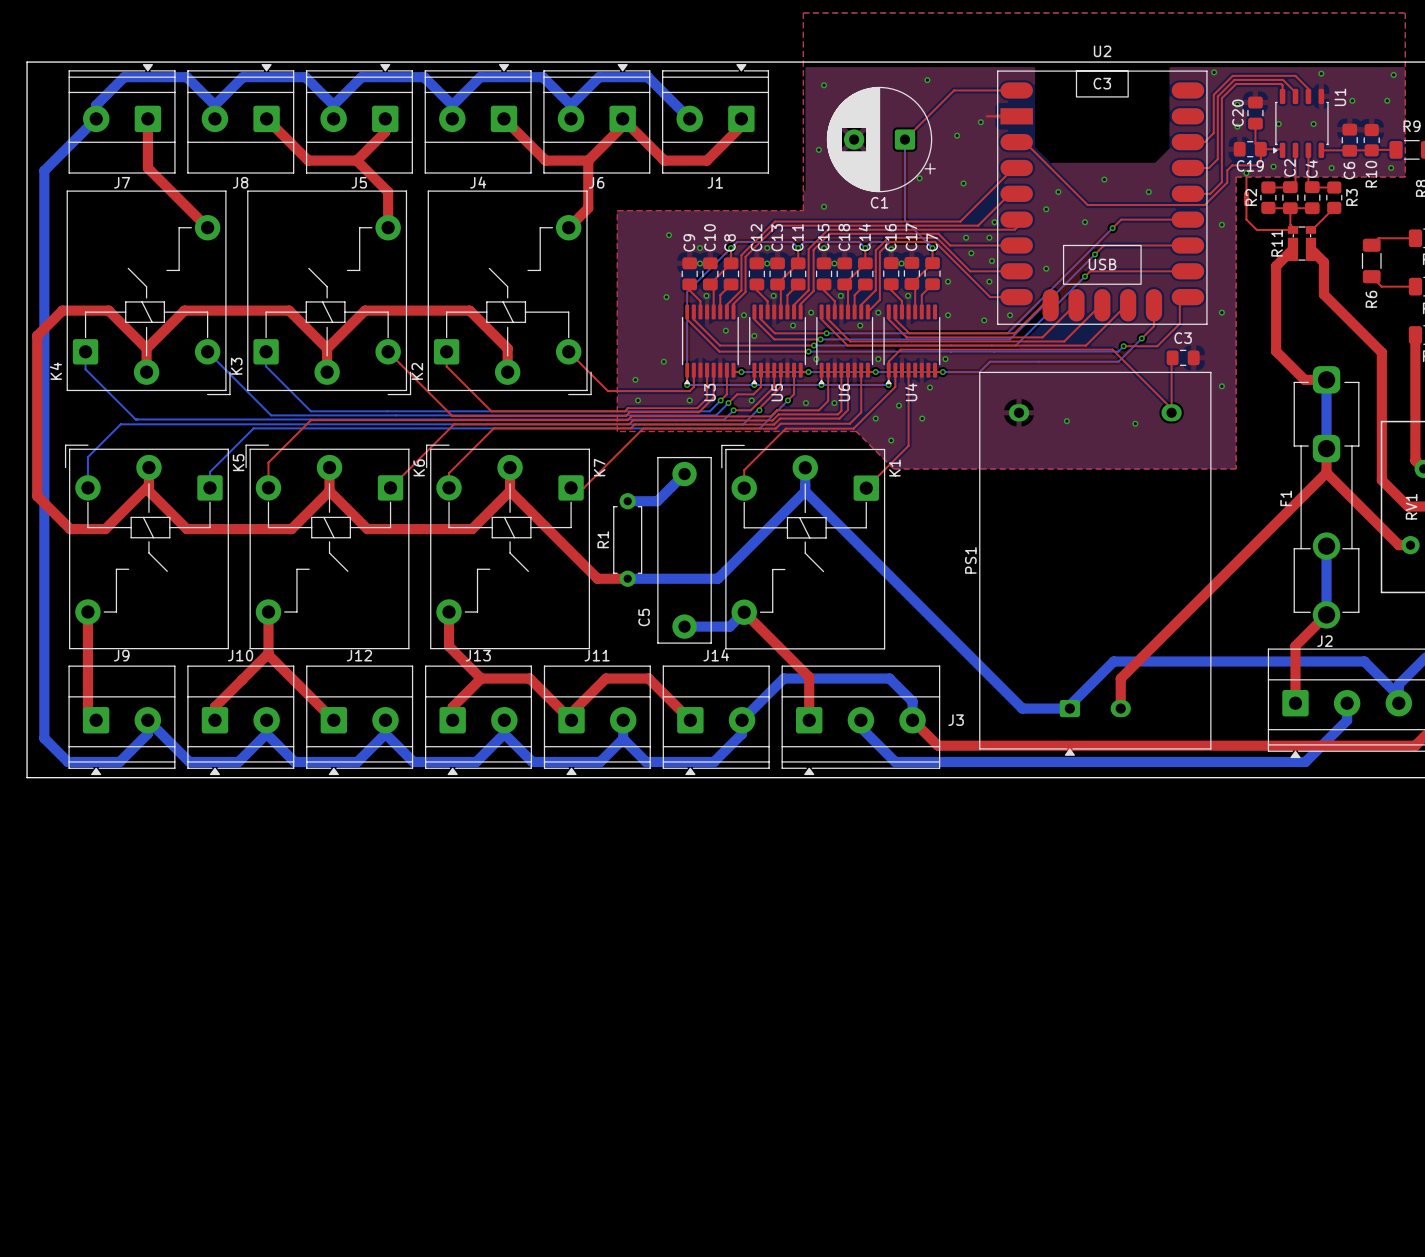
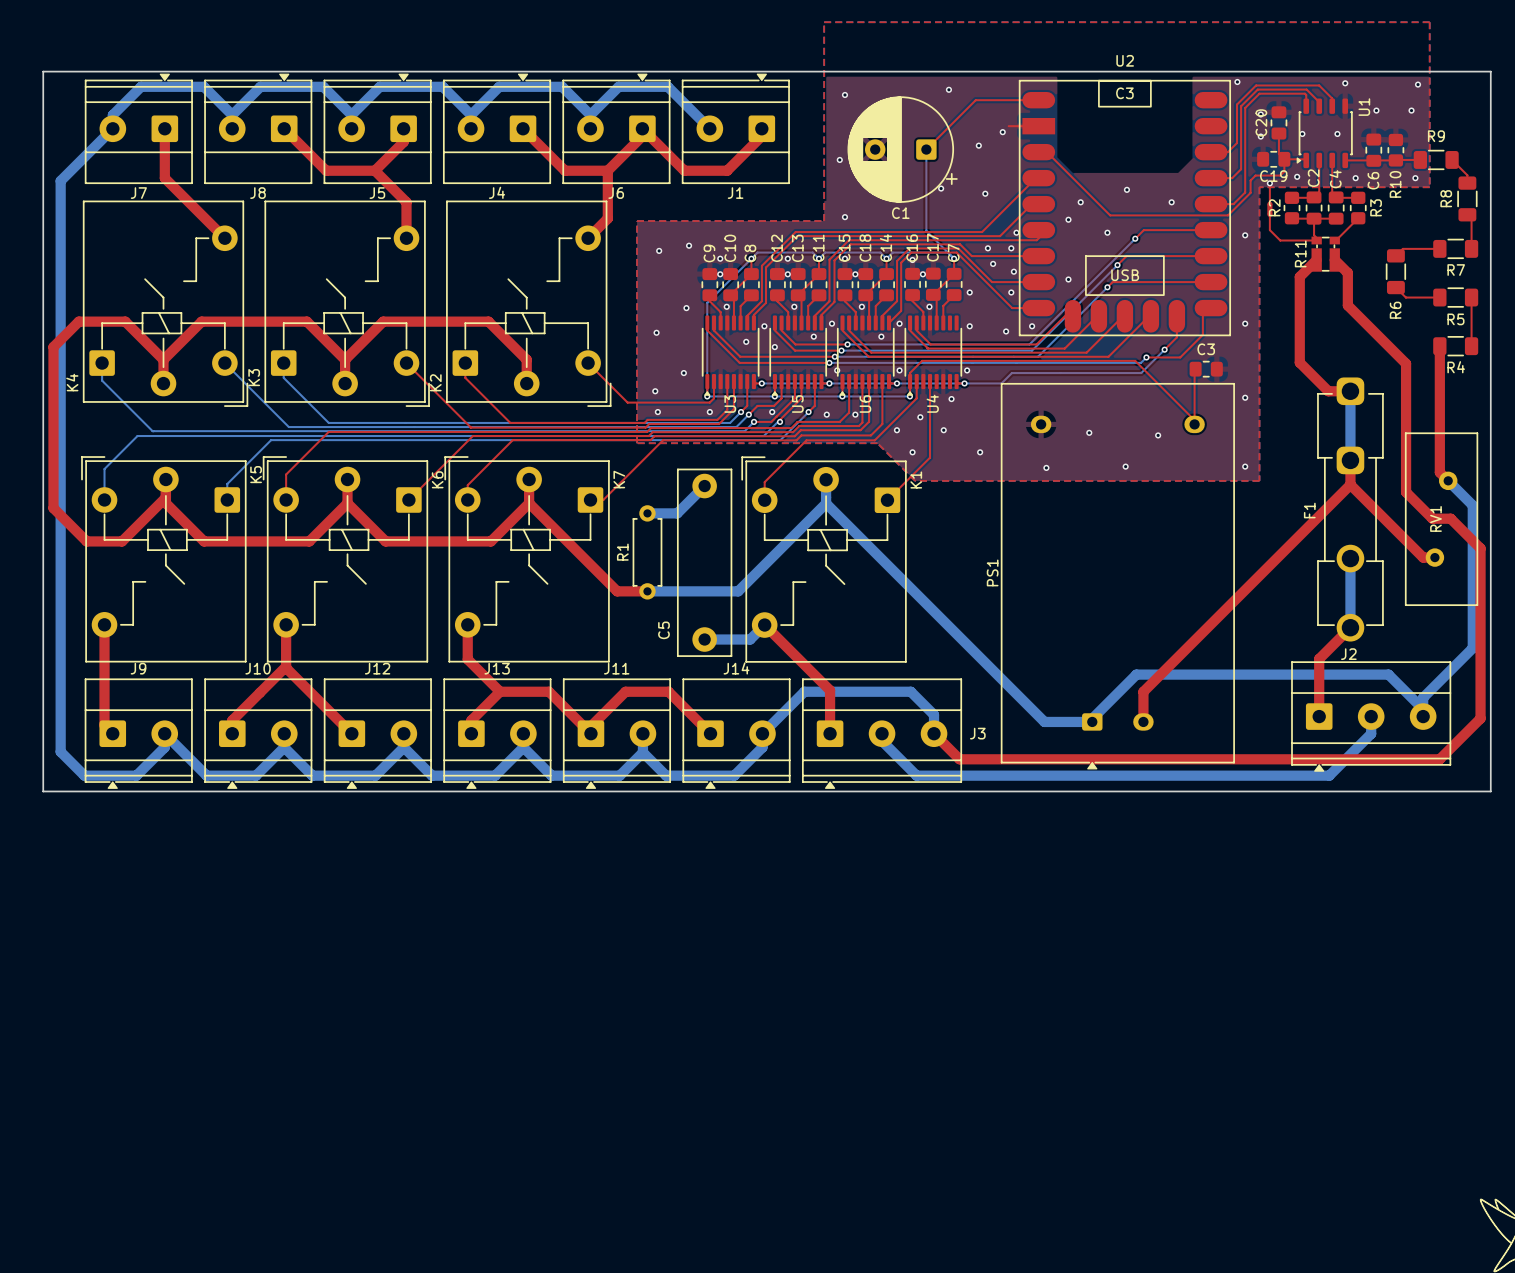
via: none -> (659, 250)
via: none -> (656, 332)
via: none -> (980, 452)
via: none -> (1125, 466)
via: none -> (1245, 466)
via: none -> (1046, 467)

